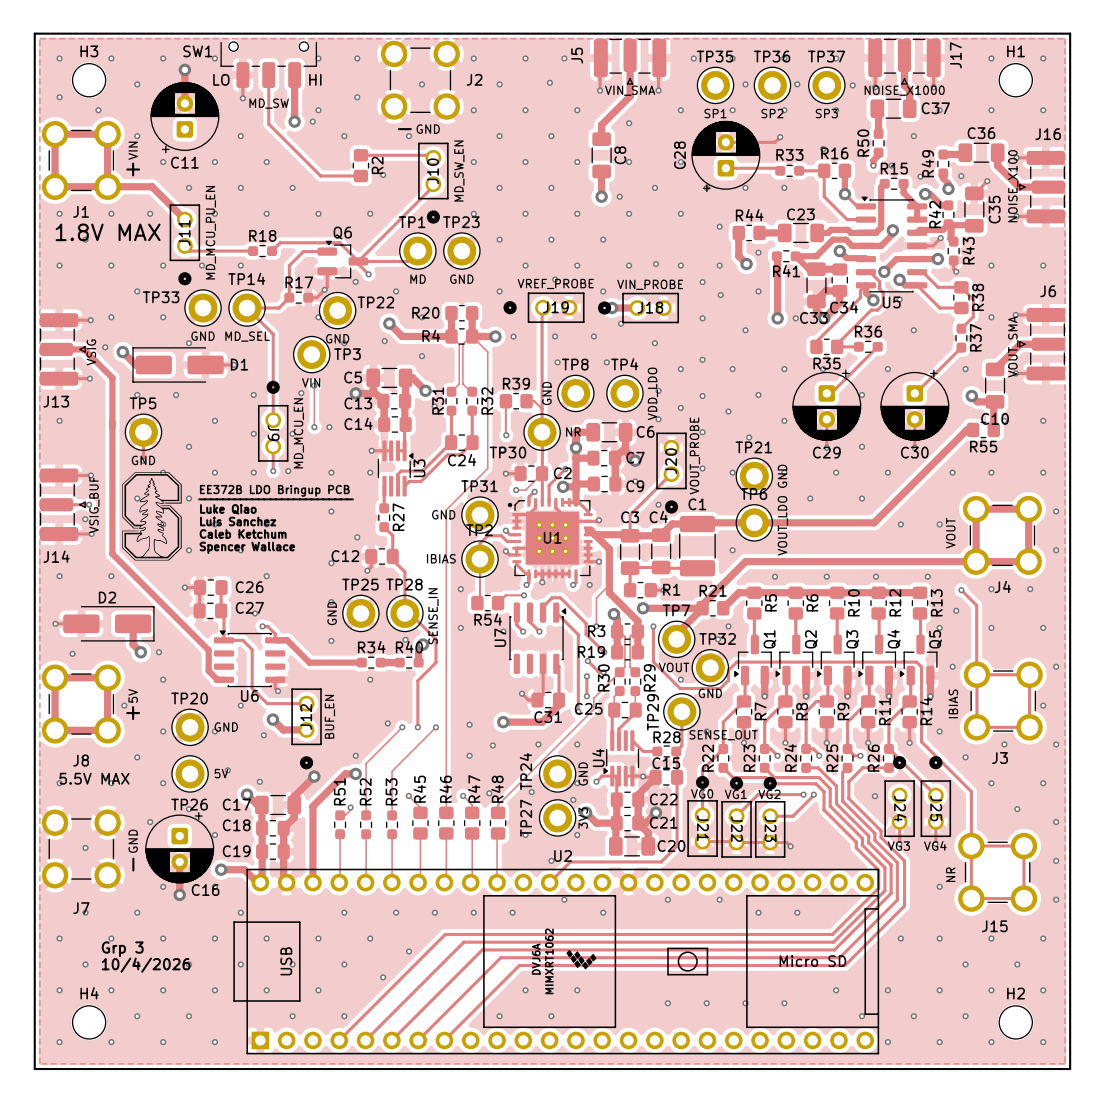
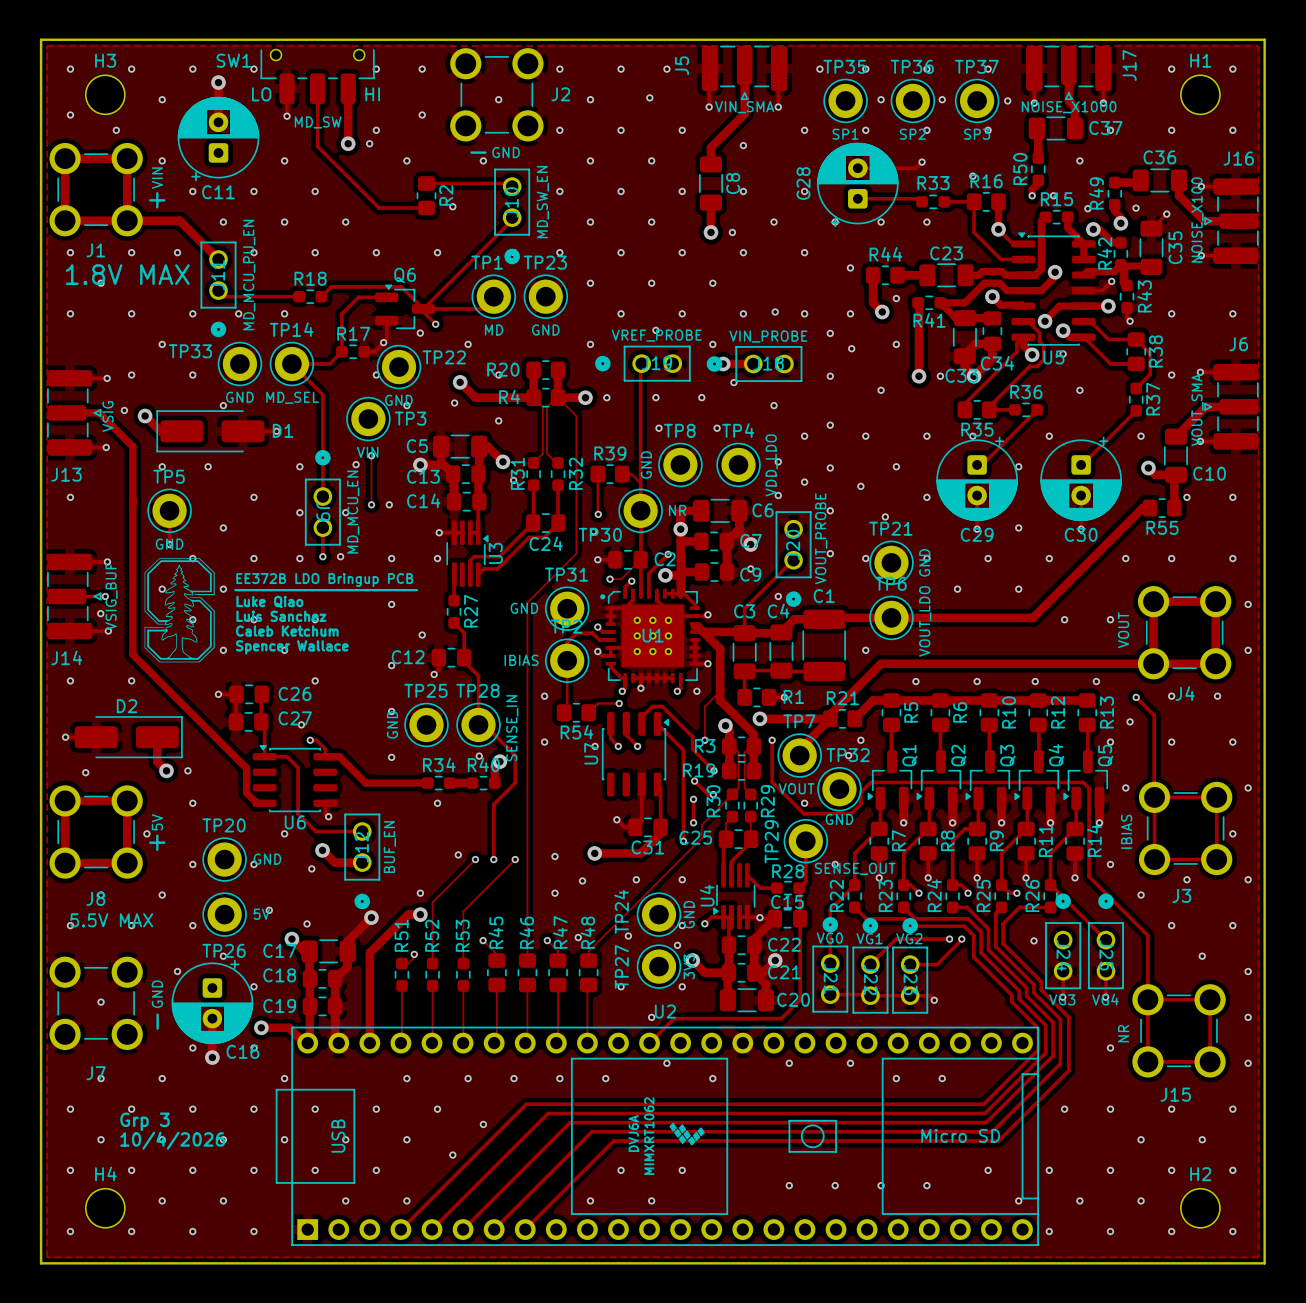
C10 name position: C10 (995, 418) -> C10 (1209, 473)

